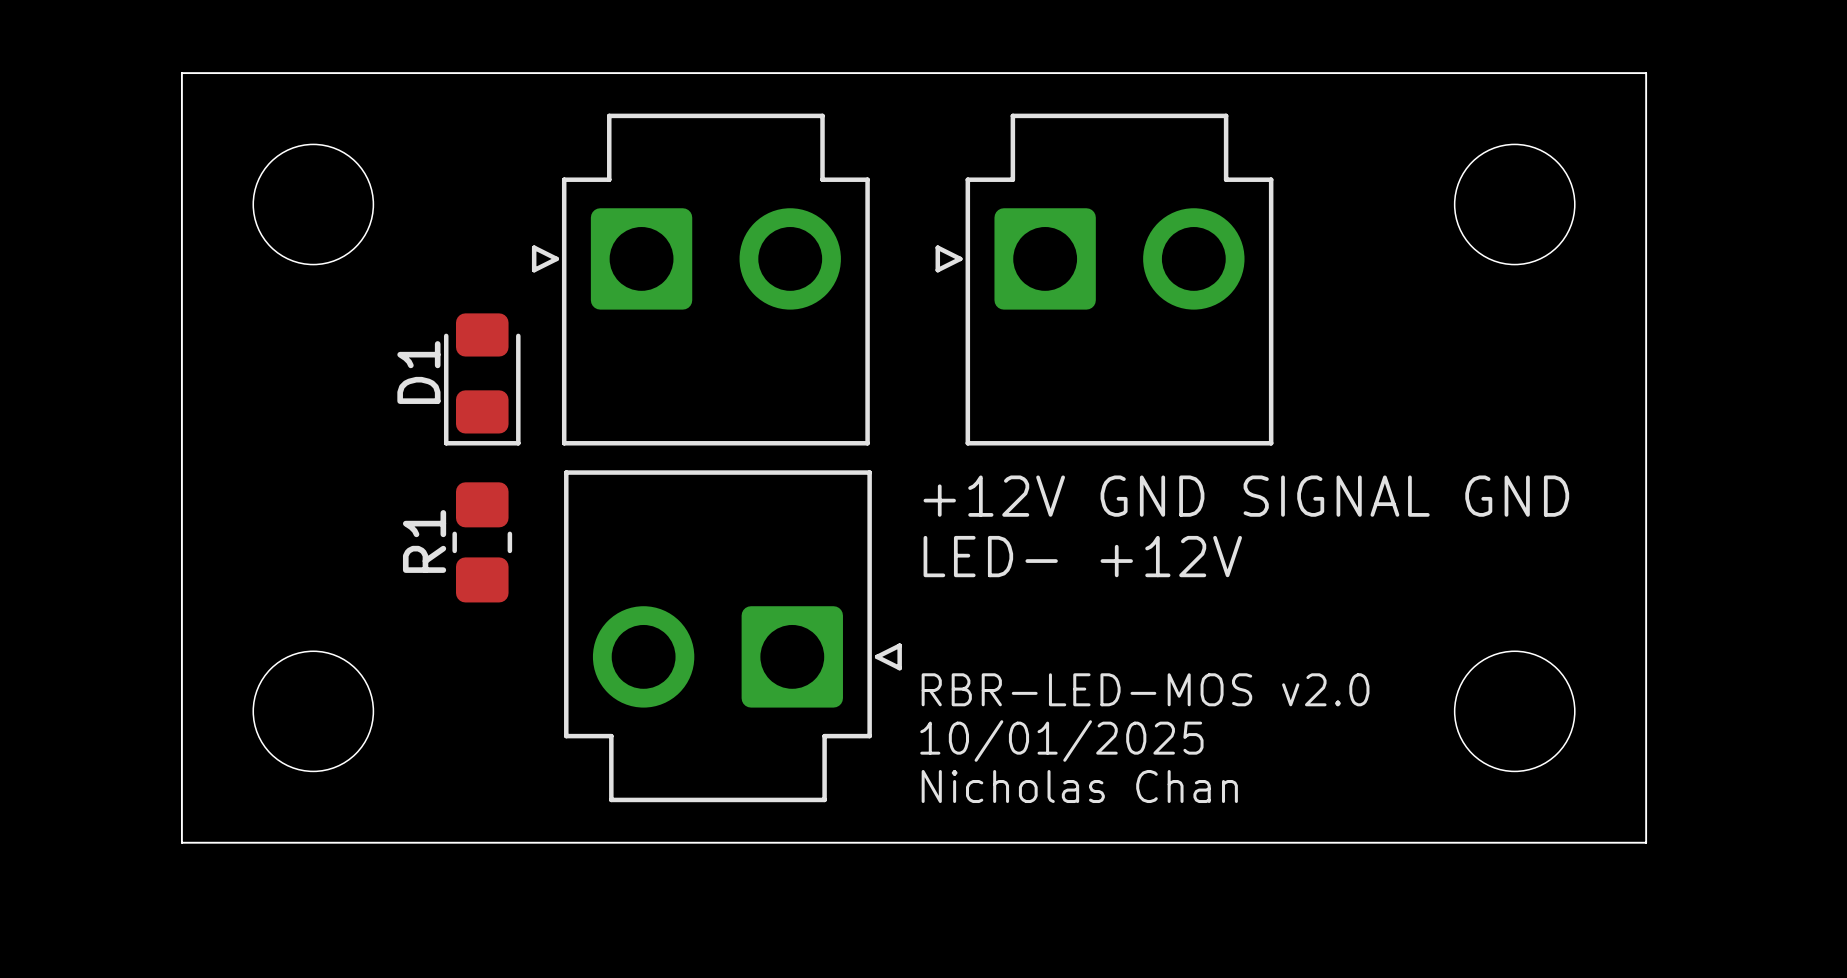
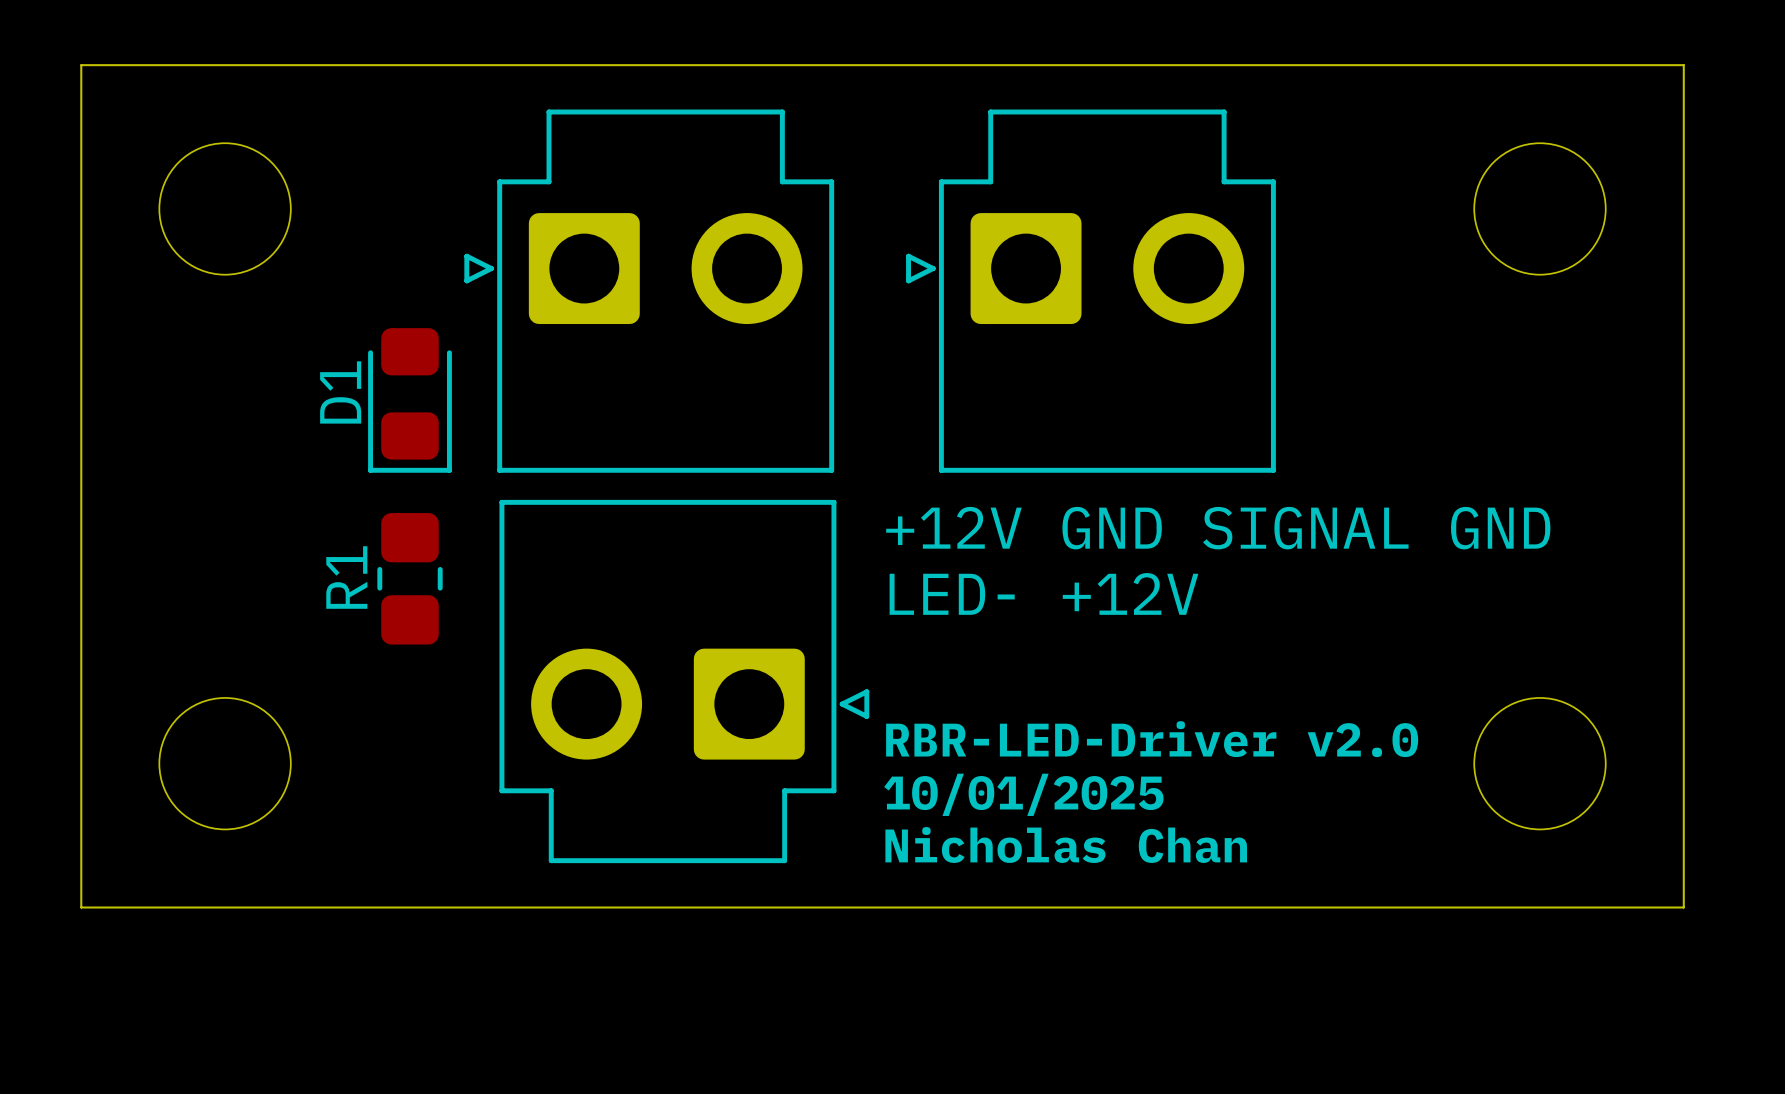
text: RBR-LED-MOS v2.0 (1145, 689) -> RBR-LED-Driver v2.0 (1152, 739)

